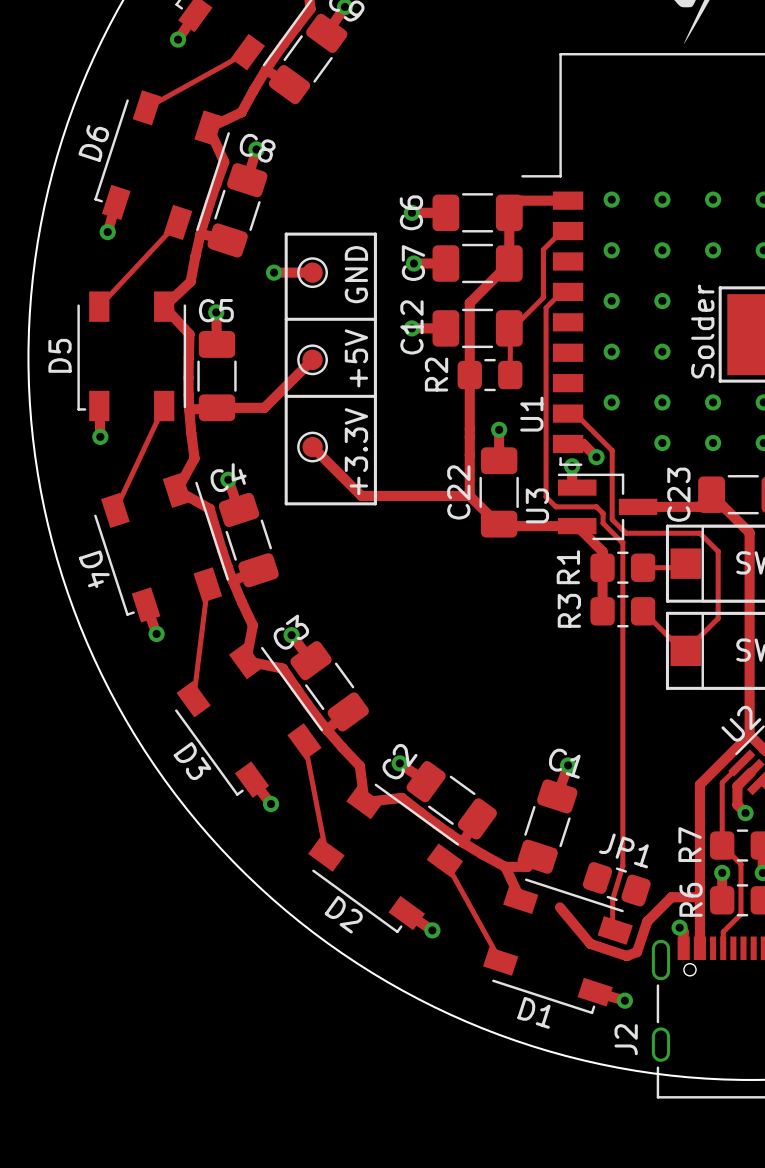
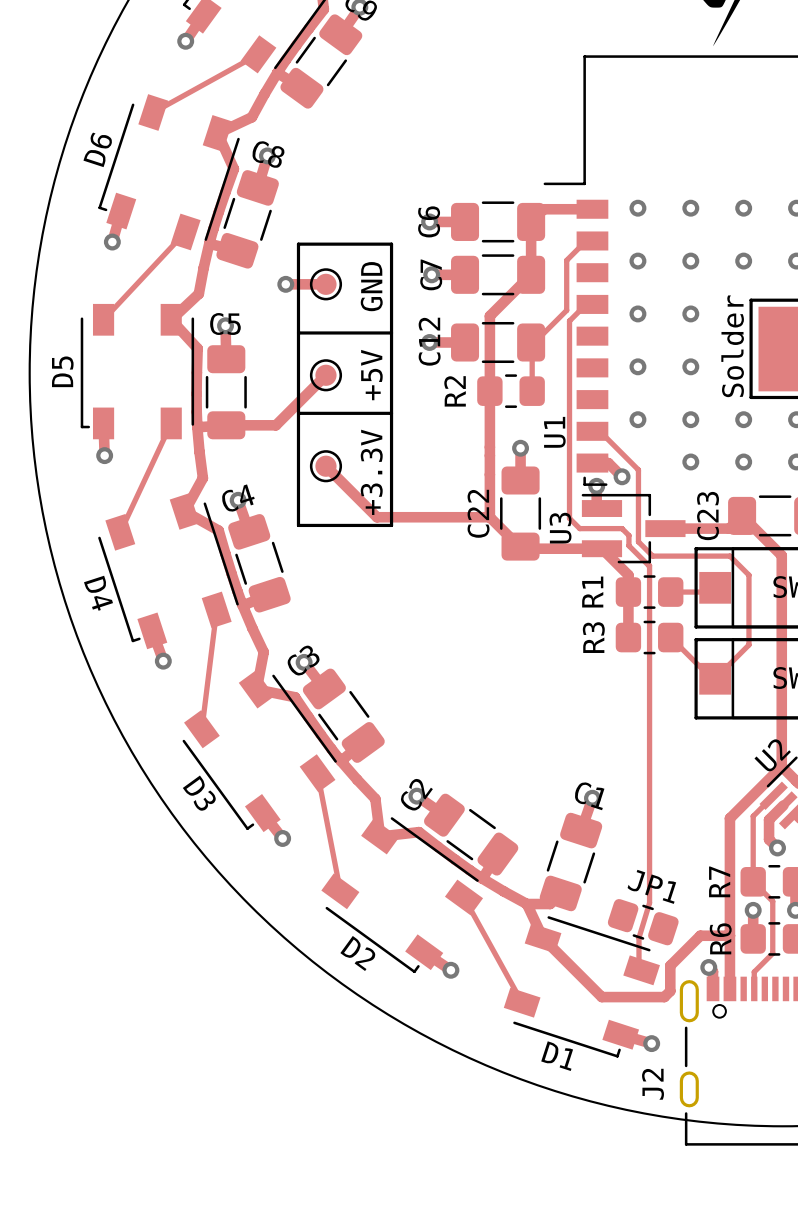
track: (559, 907) (590, 943) (626, 956) (637, 952) (647, 921) -> (543, 938) (601, 997) (664, 997) (670, 991) (670, 965) (674, 961)

